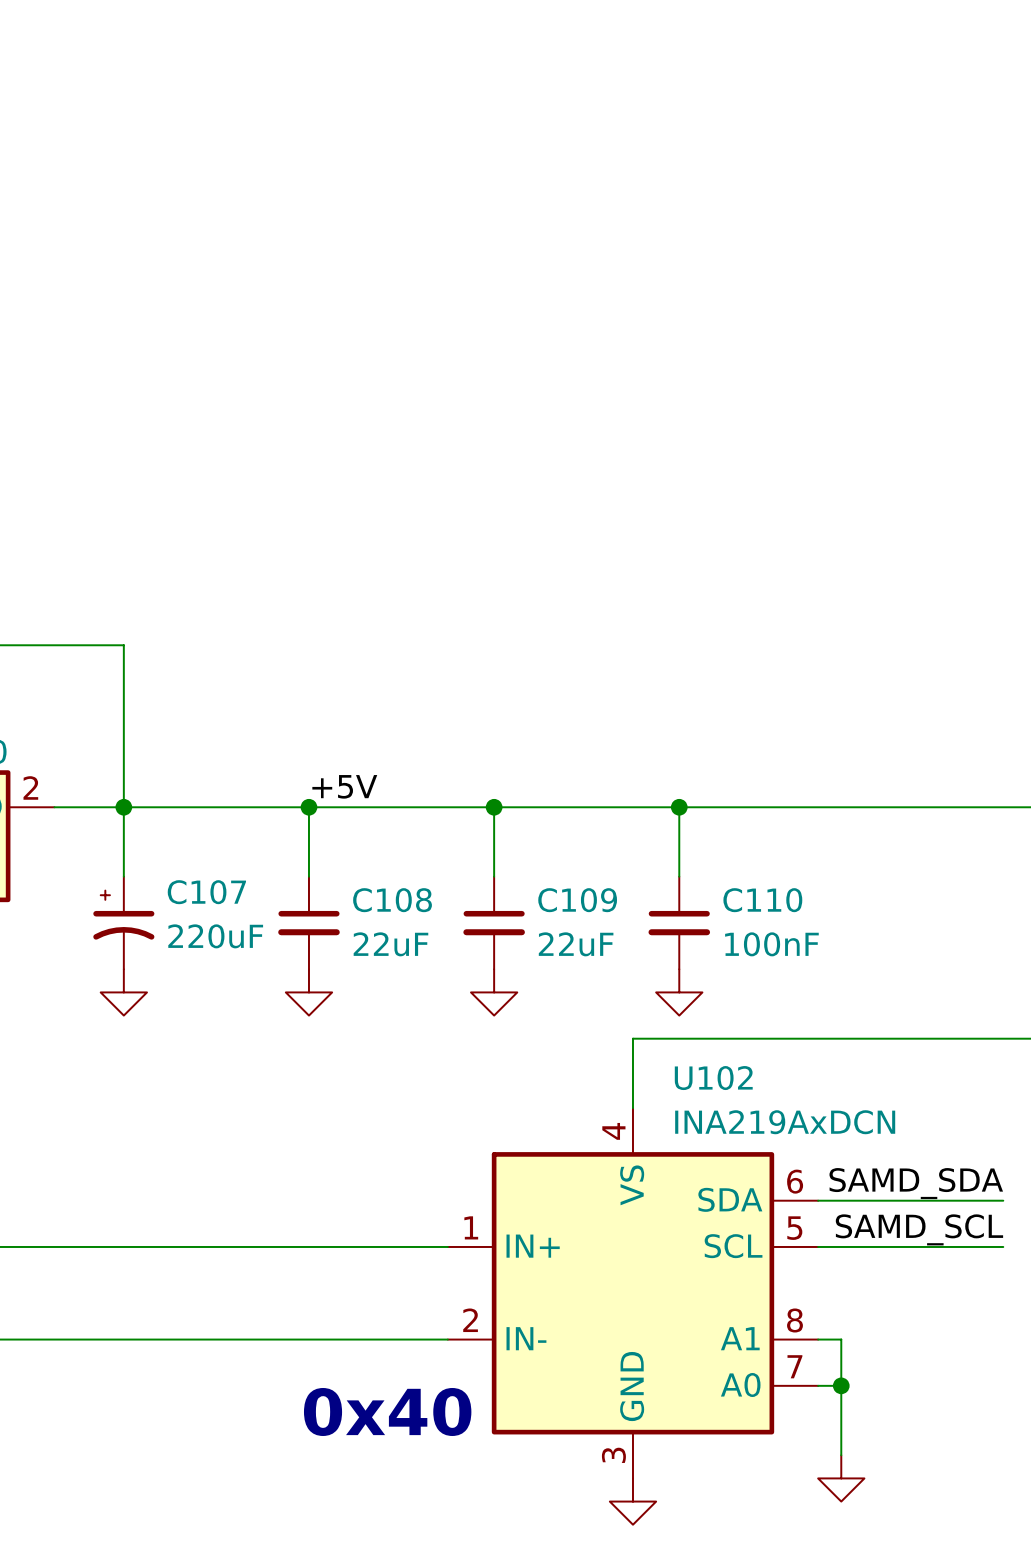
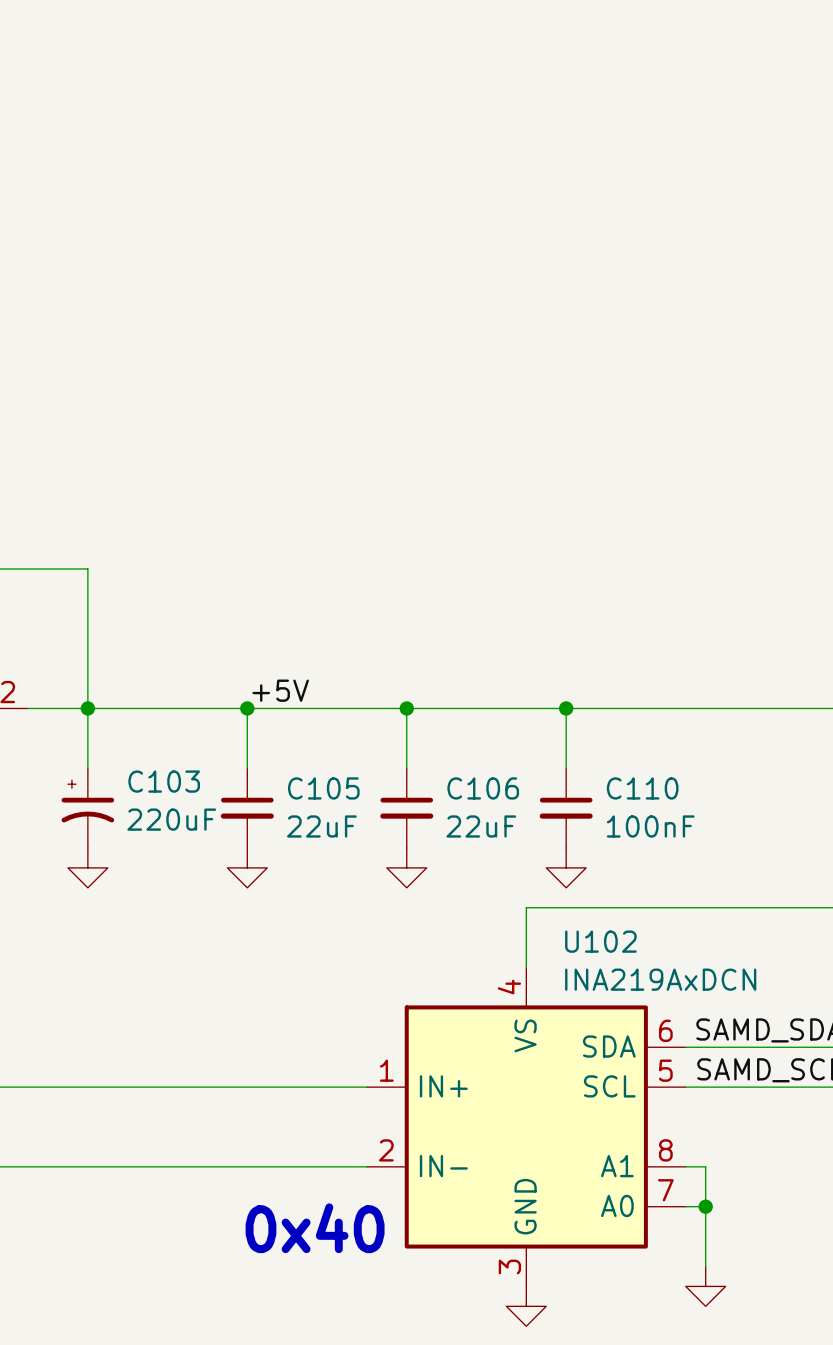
C107 name: C107 (206, 892) -> C103 (164, 781)
C108 name: C108 (392, 900) -> C105 (323, 788)
C109 name: C109 (577, 900) -> C106 (483, 788)

